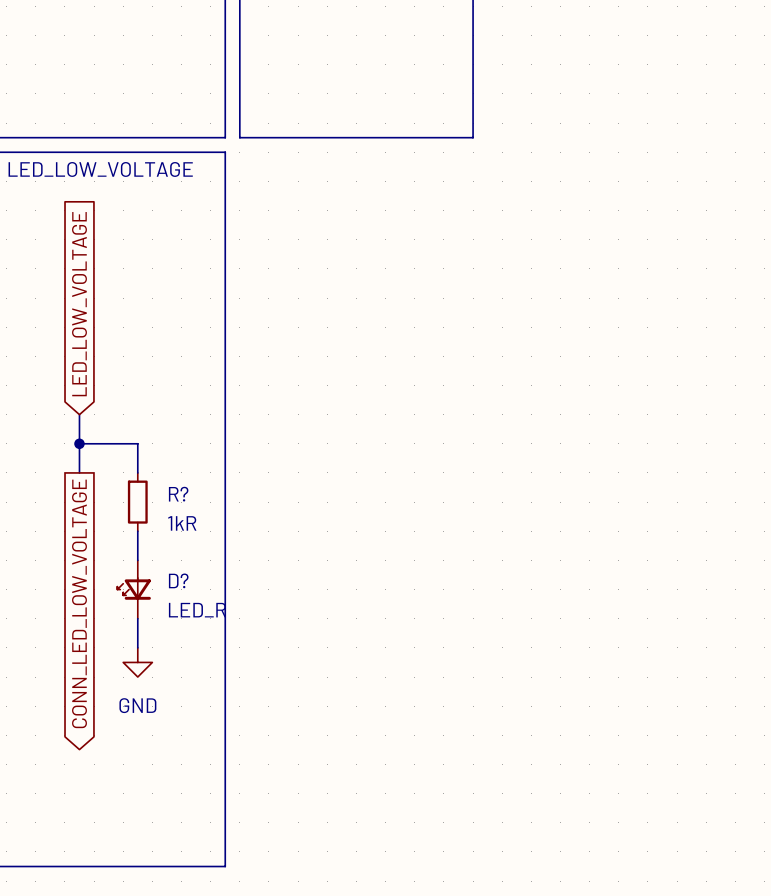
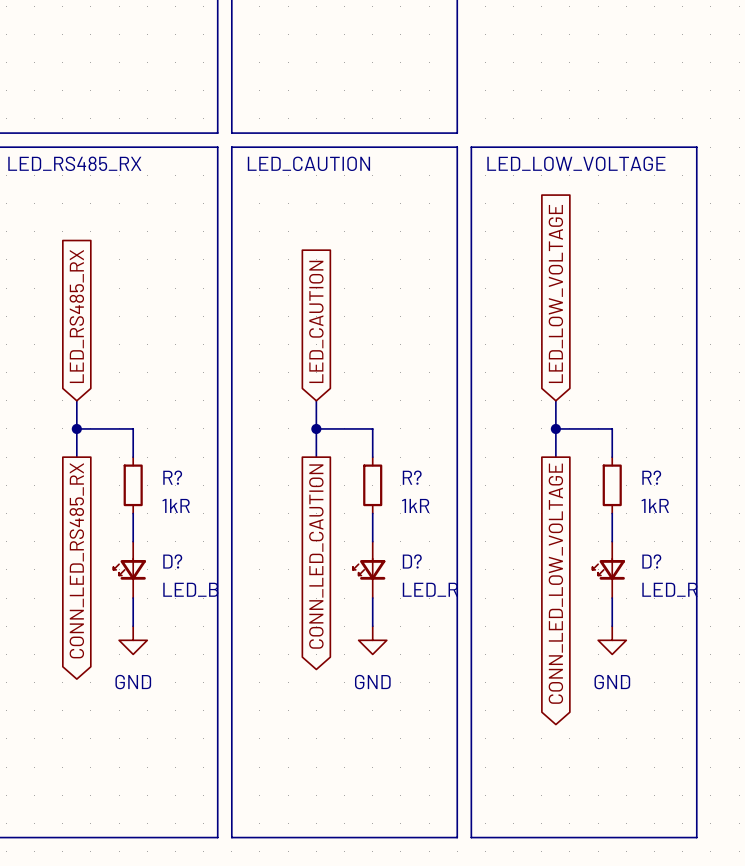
line: none -> (231, 147) (457, 147) (457, 837) (231, 837) (231, 147)
line: none -> (471, 147) (696, 147) (696, 837) (471, 837) (471, 147)
text: LED_LOW_VOLTAGE (100, 169) -> LED_RS485_RX (74, 163)
text: none -> LED_CAUTION (308, 163)
text: none -> LED_LOW_VOLTAGE (576, 163)
global label: LED_LOW_VOLTAGE (79, 304) -> LED_RS485_RX (76, 316)
global label: none -> LED_LOW_VOLTAGE (555, 294)
global label: none -> LED_CAUTION (316, 321)
wire: none -> (316, 400) (316, 457)
wire: none -> (555, 400) (555, 457)
wire: none -> (316, 428) (372, 428) (372, 457)
junction: none -> (316, 428)
wire: none -> (555, 428) (612, 428) (612, 457)
junction: none -> (555, 428)
R?: none -> 1kR (372, 485)
R?: none -> 1kR (612, 485)
wire: none -> (372, 513) (372, 541)
wire: none -> (612, 513) (612, 541)
global label: none -> CONN_LED_CAUTION (316, 556)
D?: none -> LED_R (369, 569)
D?: none -> LED_R (608, 569)
global label: CONN_LED_LOW_VOLTAGE (79, 603) -> CONN_LED_RS485_RX (76, 560)
global label: none -> CONN_LED_LOW_VOLTAGE (555, 583)
D? value: LED_R (197, 610) -> LED_B (190, 589)
wire: none -> (372, 598) (372, 626)
wire: none -> (612, 598) (612, 626)
power symbol: none -> GND (372, 640)
power symbol: none -> GND (612, 640)

